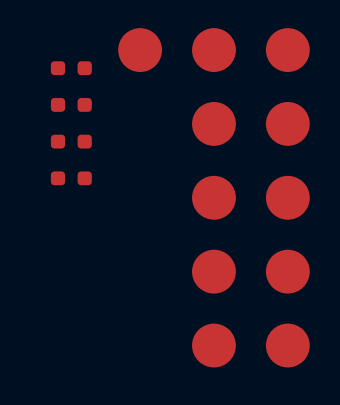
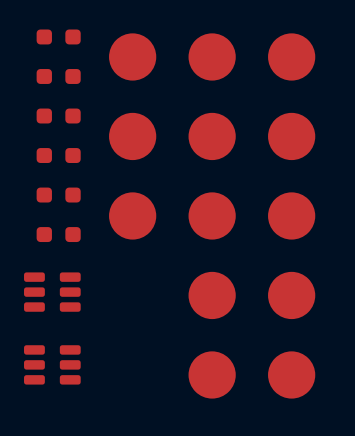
part: none -> (58, 36)
part: none -> (132, 136)
part: none -> (132, 215)
part: none -> (58, 234)
part: none -> (52, 292)
part: none -> (52, 364)

